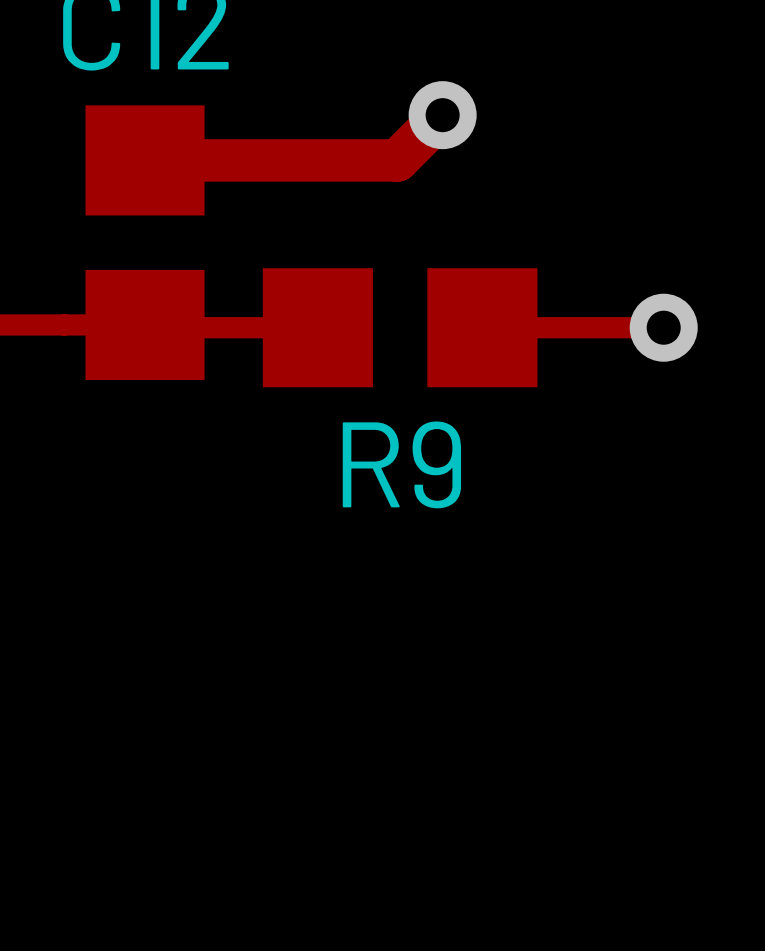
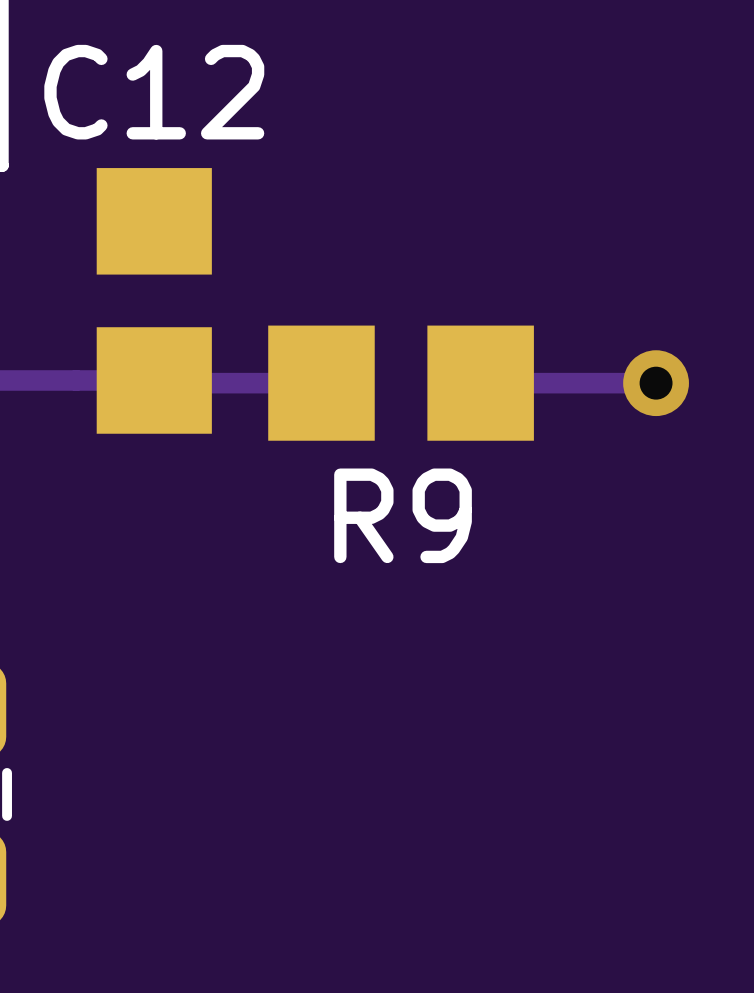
track: (442, 115) (397, 160) (145, 160) -> none
via: (442, 115) -> none

